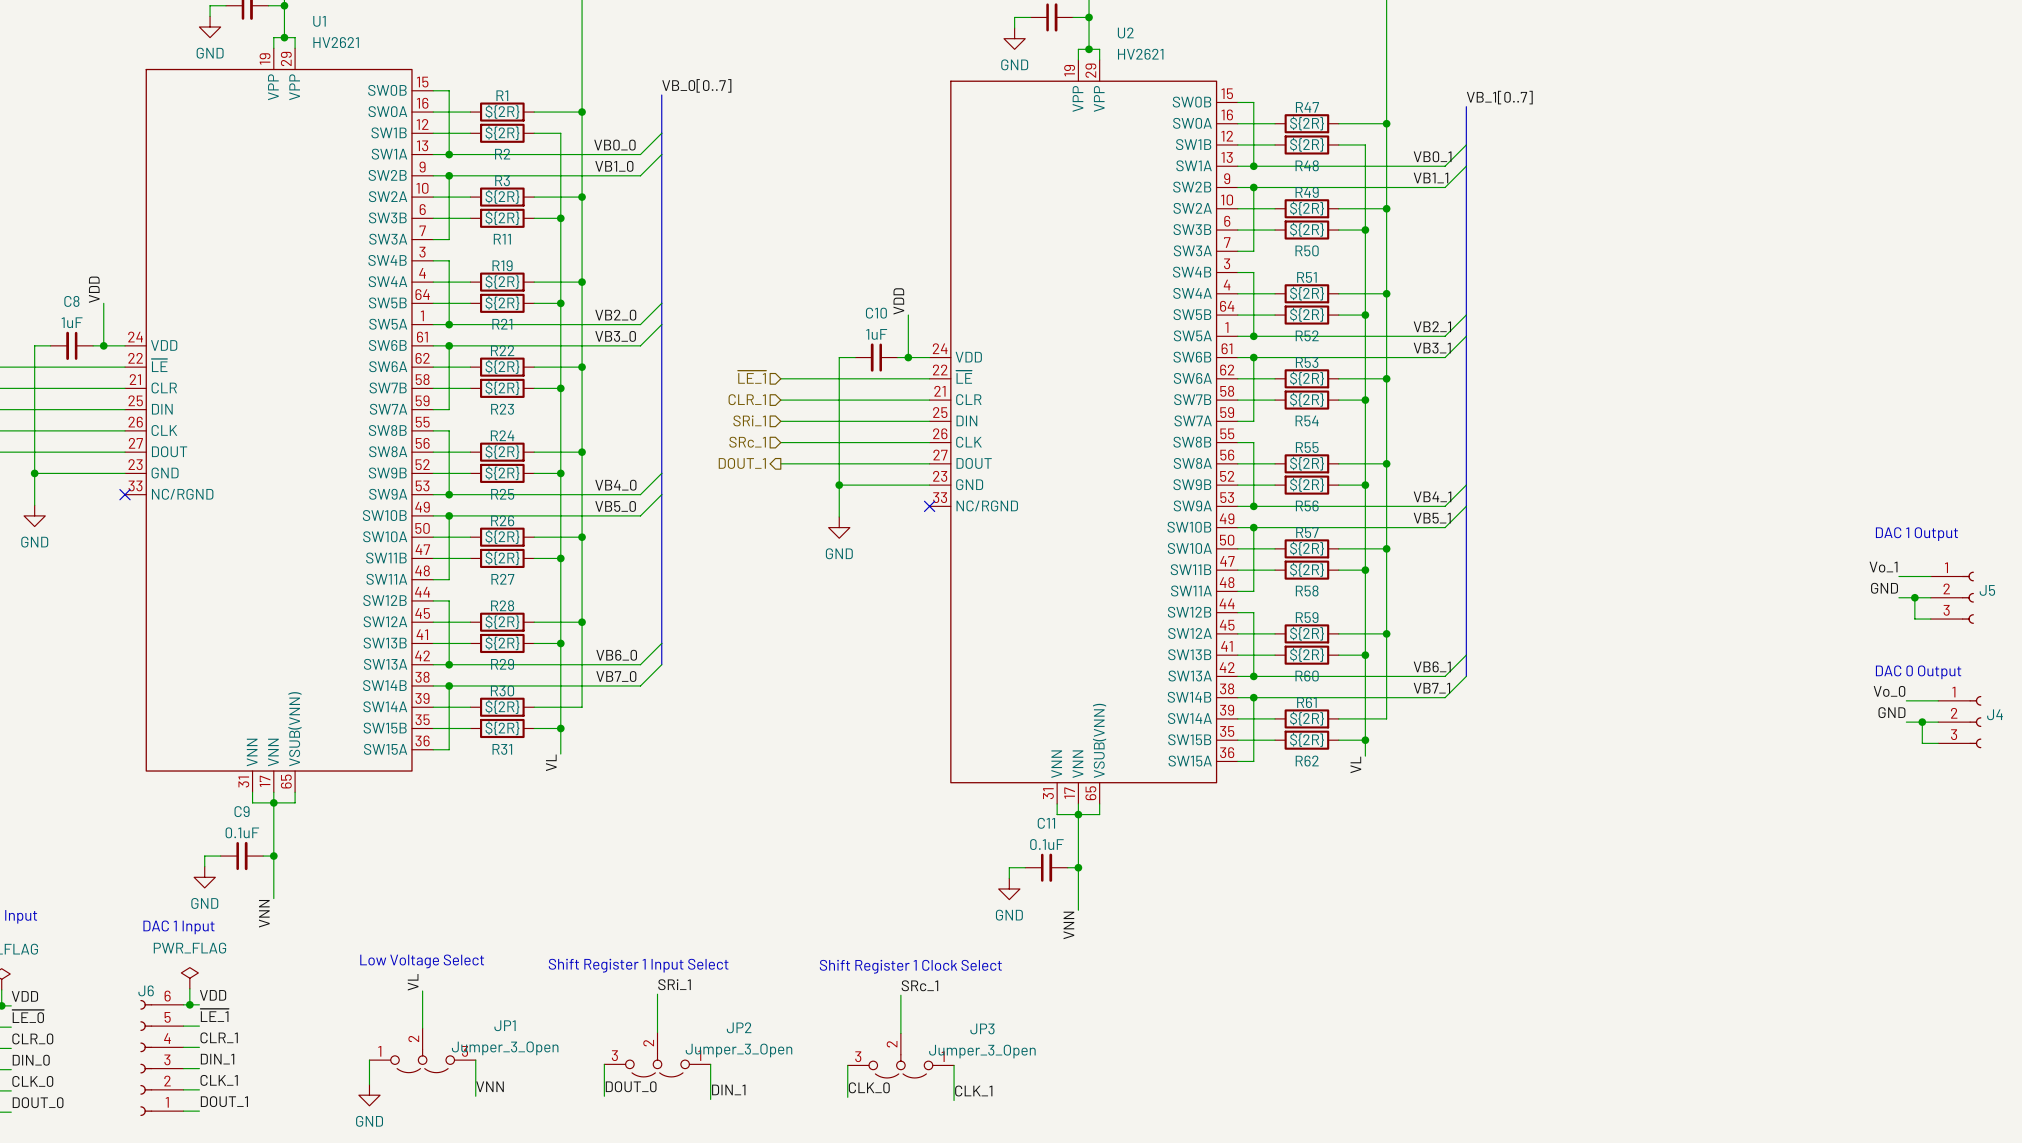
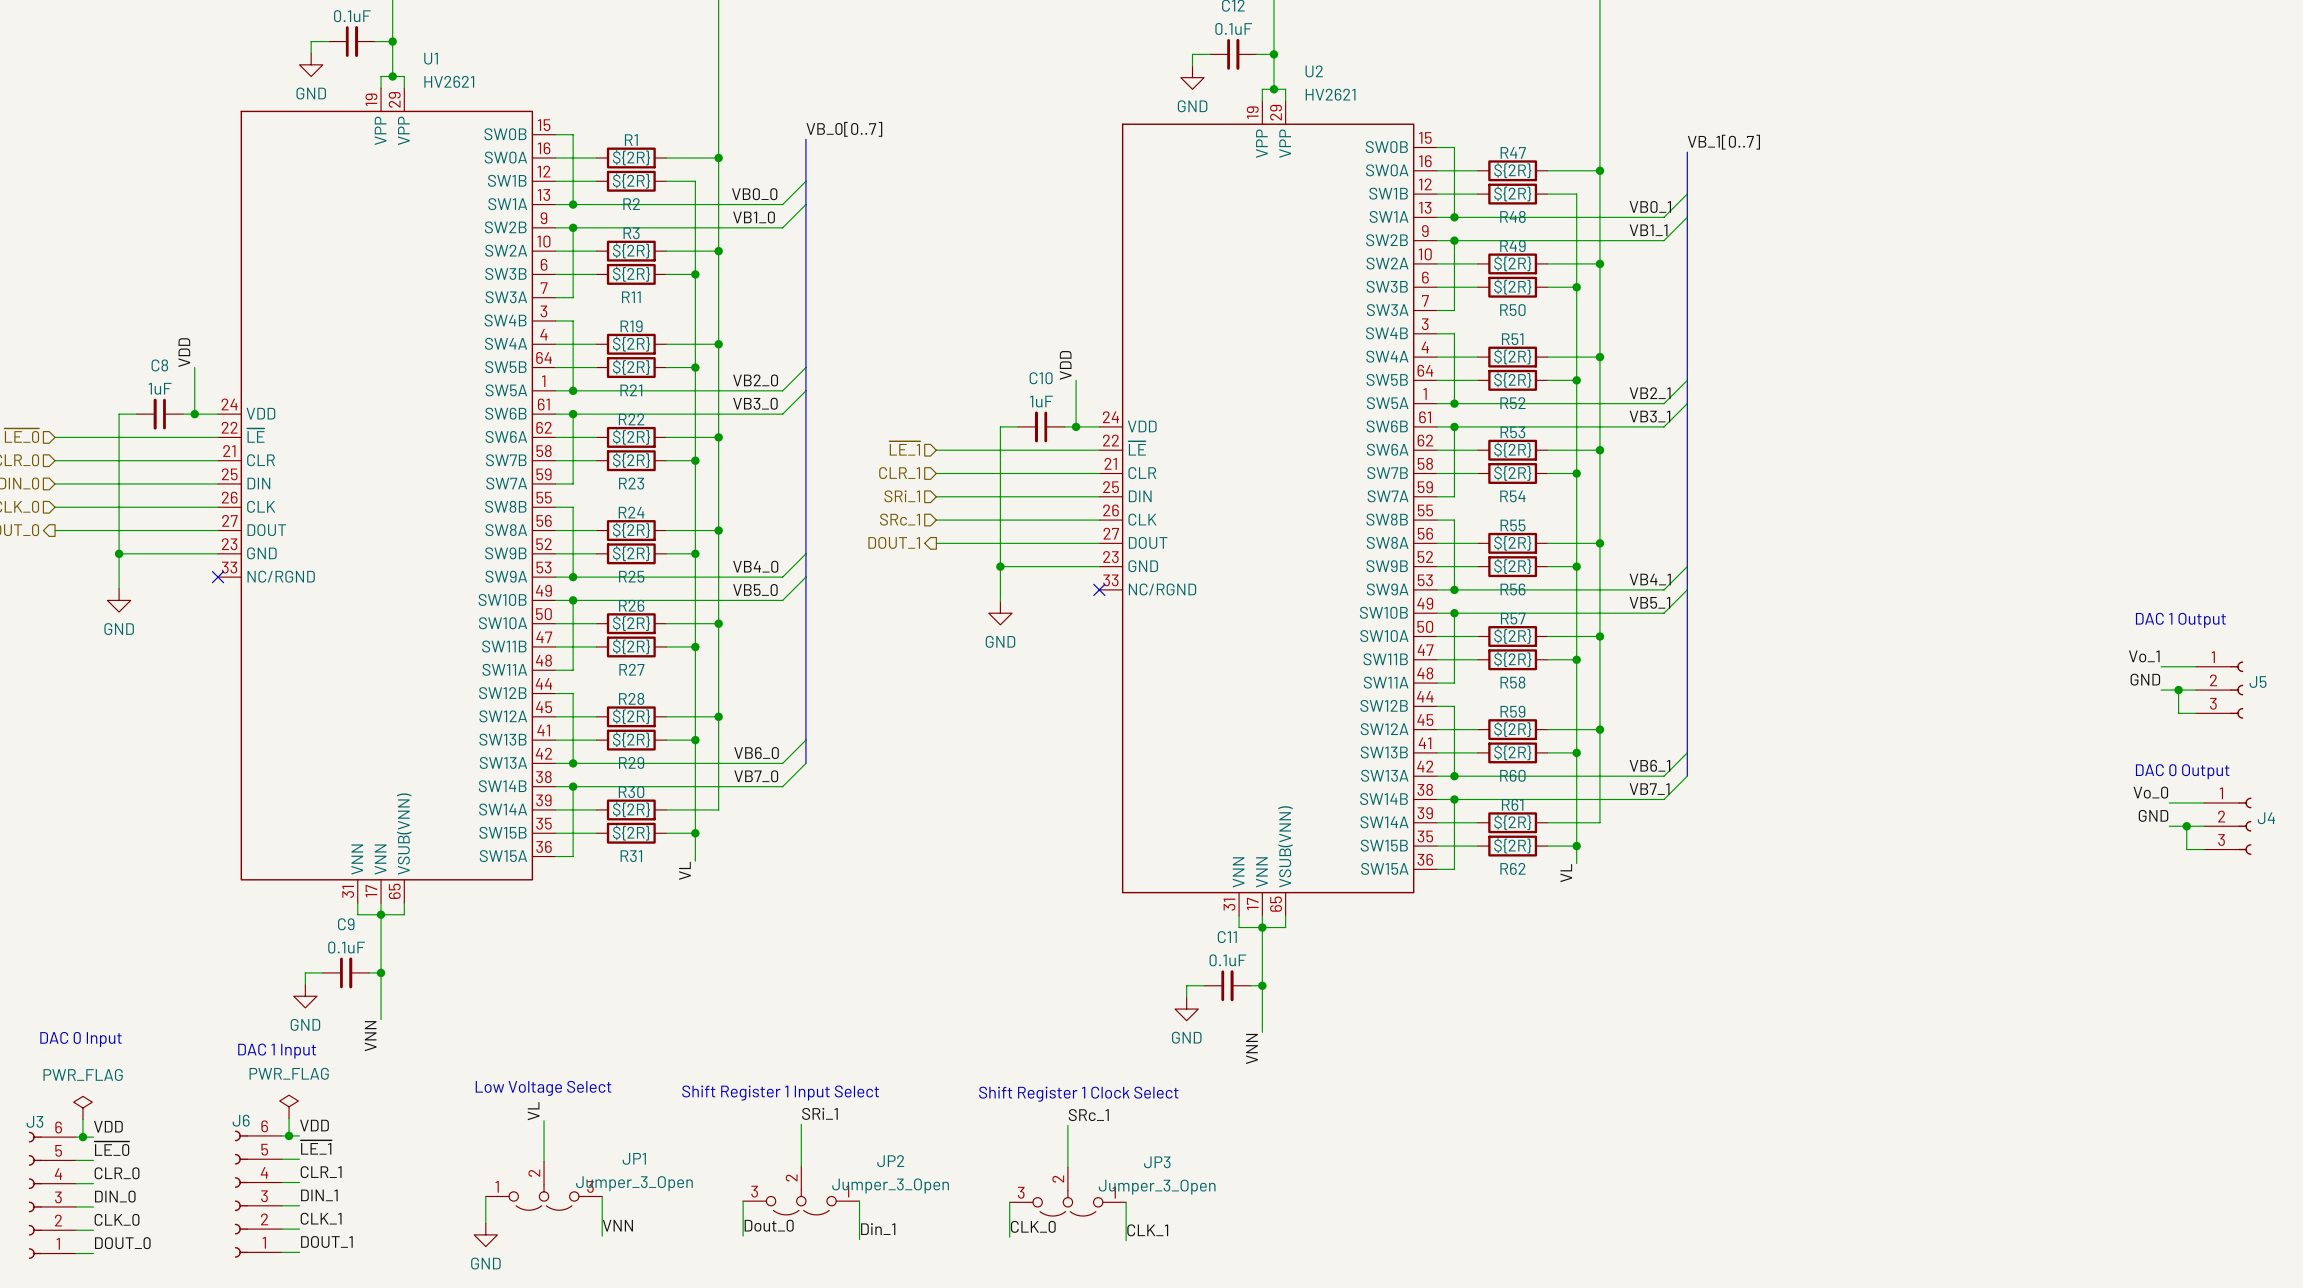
label: DOUT_0 (631, 1086) -> Dout_0 (769, 1225)
label: DIN_1 (728, 1089) -> Din_1 (878, 1229)

